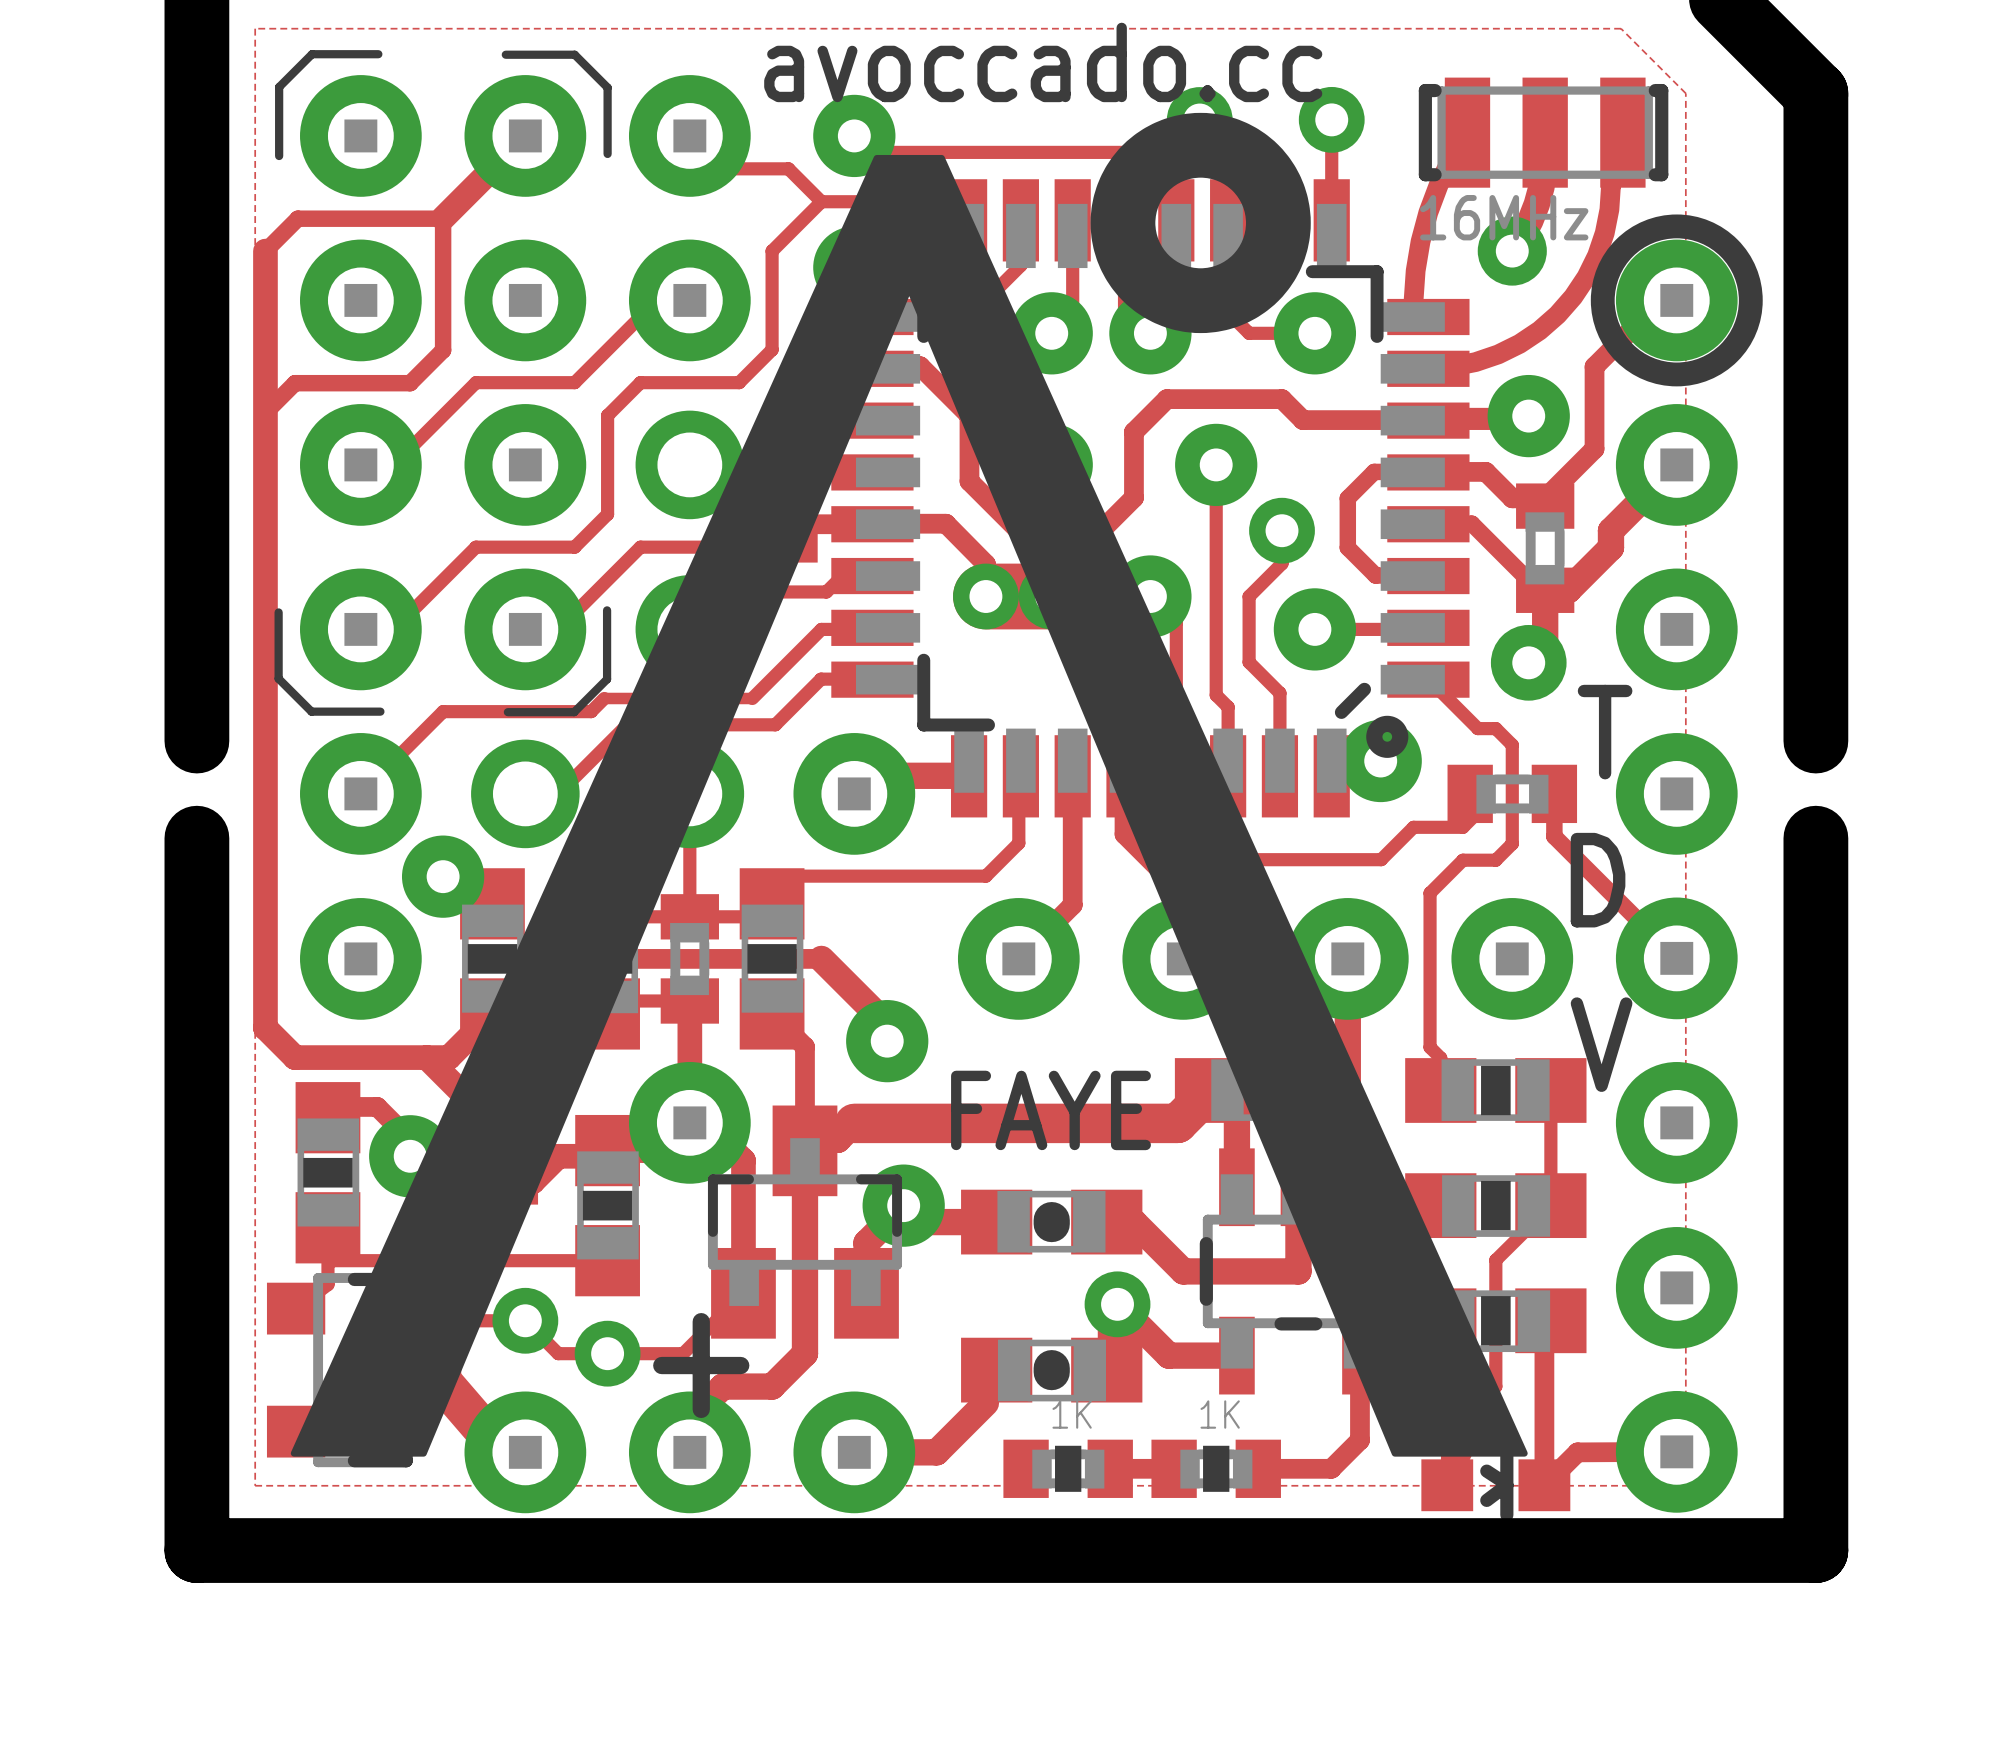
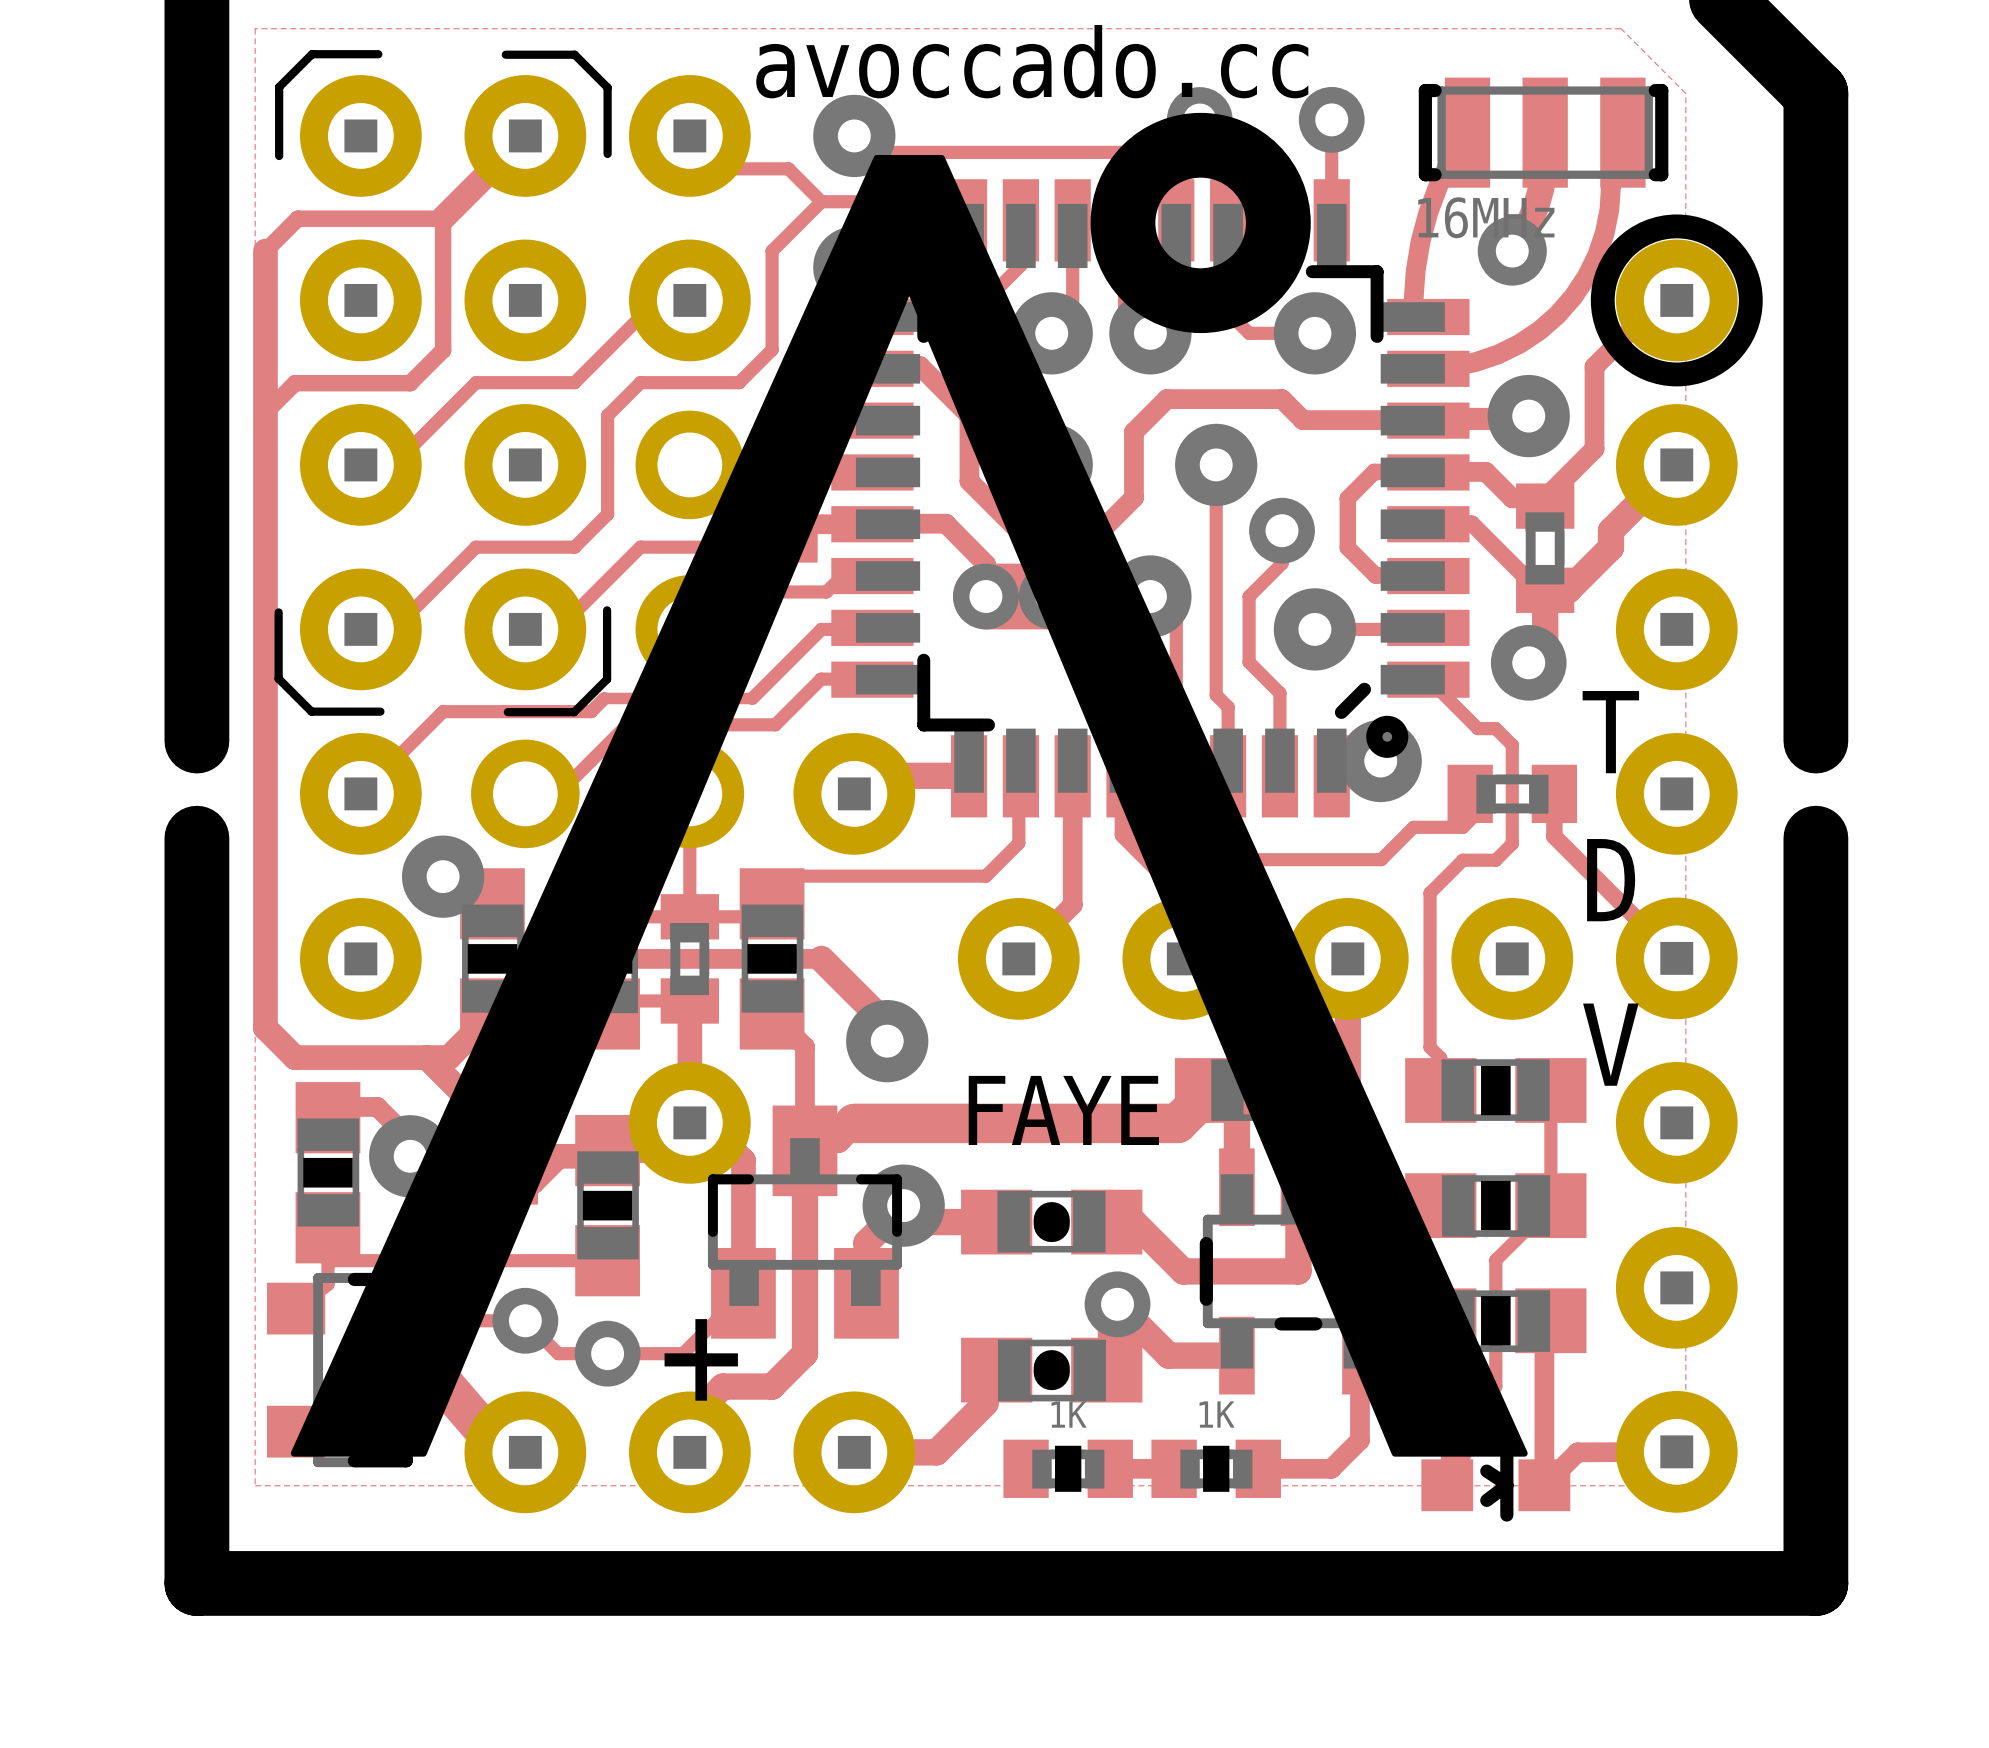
board edge: (196, 1550) (1815, 1550) -> (196, 1550) (196, 1583) (1815, 1583) (1815, 1550)

